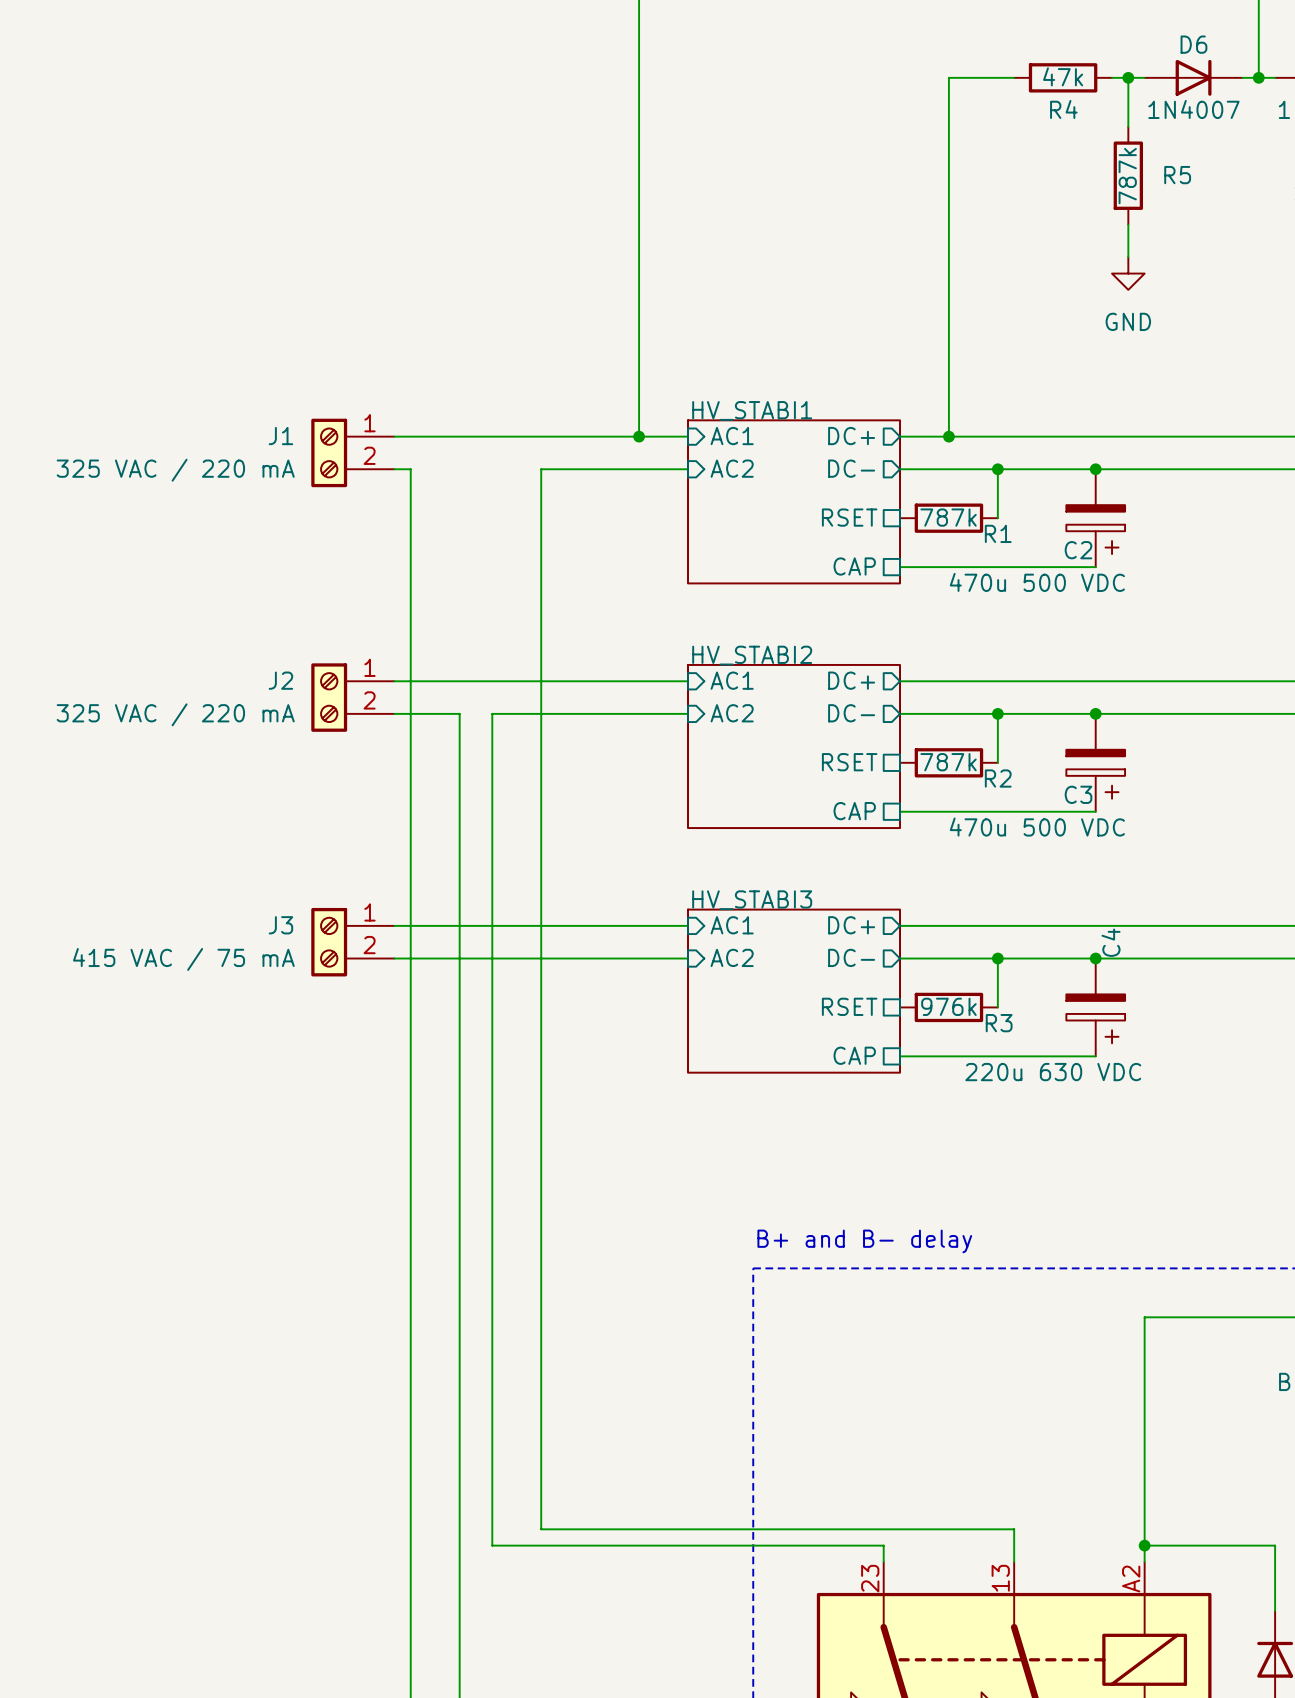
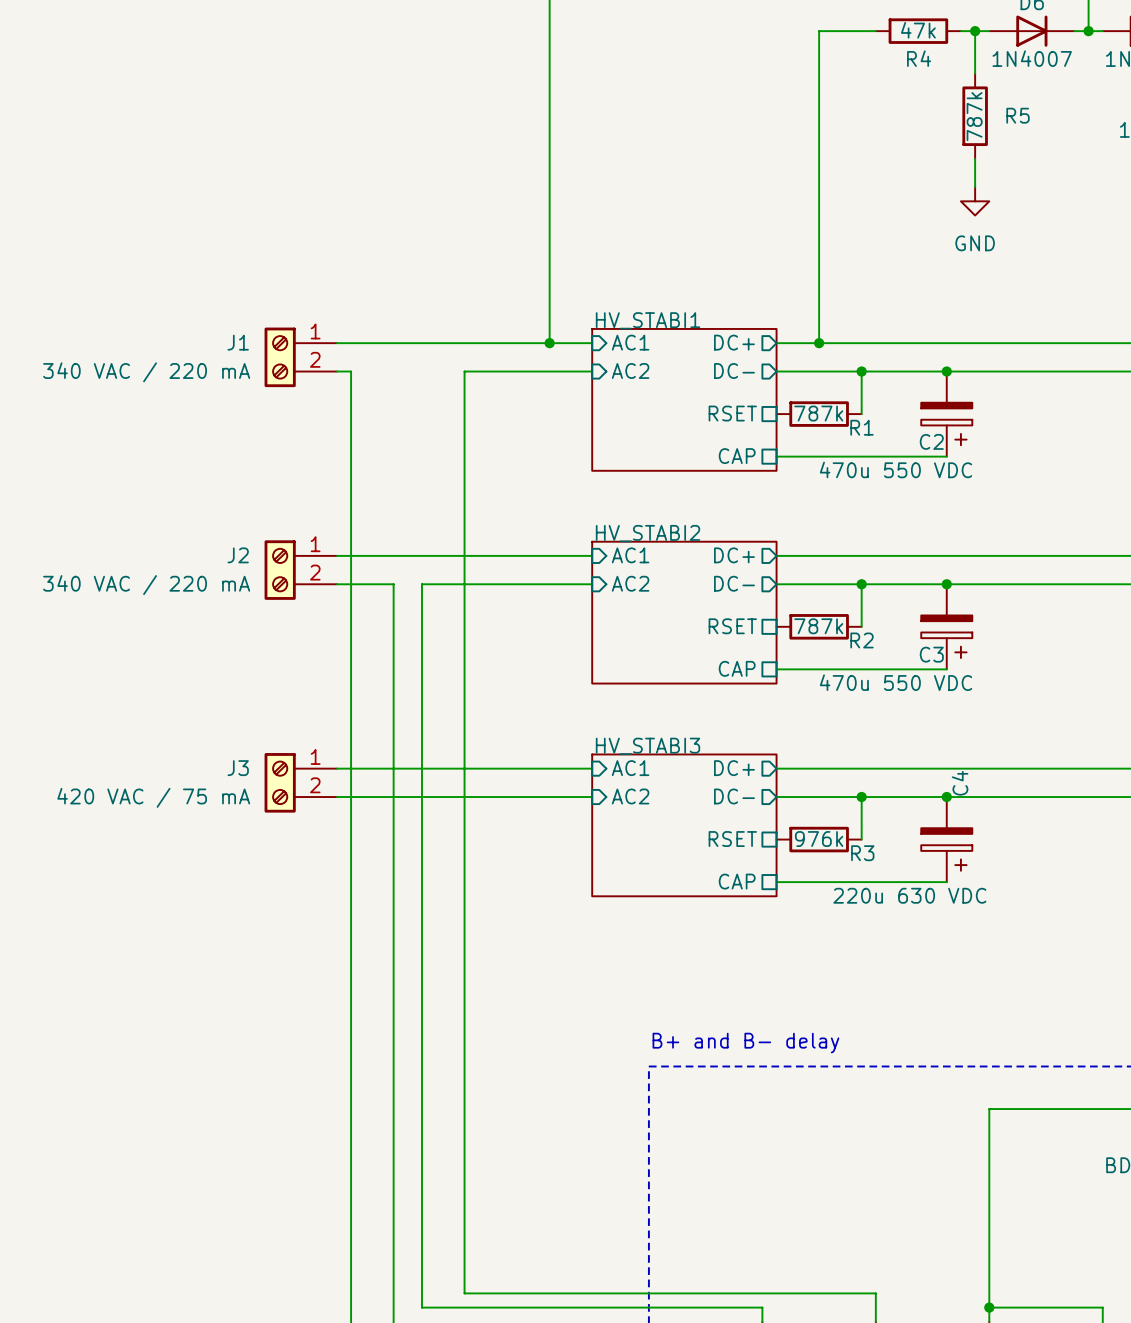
J1 value: 325 VAC / 220 mA (175, 470) -> 340 VAC / 220 mA (146, 372)
C2 value: 470u 500 VDC (1037, 582) -> 470u 550 VDC (896, 469)
J2 value: 325 VAC / 220 mA (175, 714) -> 340 VAC / 220 mA (146, 585)
C3 value: 470u 500 VDC (1037, 827) -> 470u 550 VDC (896, 682)
J3 value: 415 VAC / 75 mA (183, 959) -> 420 VAC / 75 mA (153, 797)

